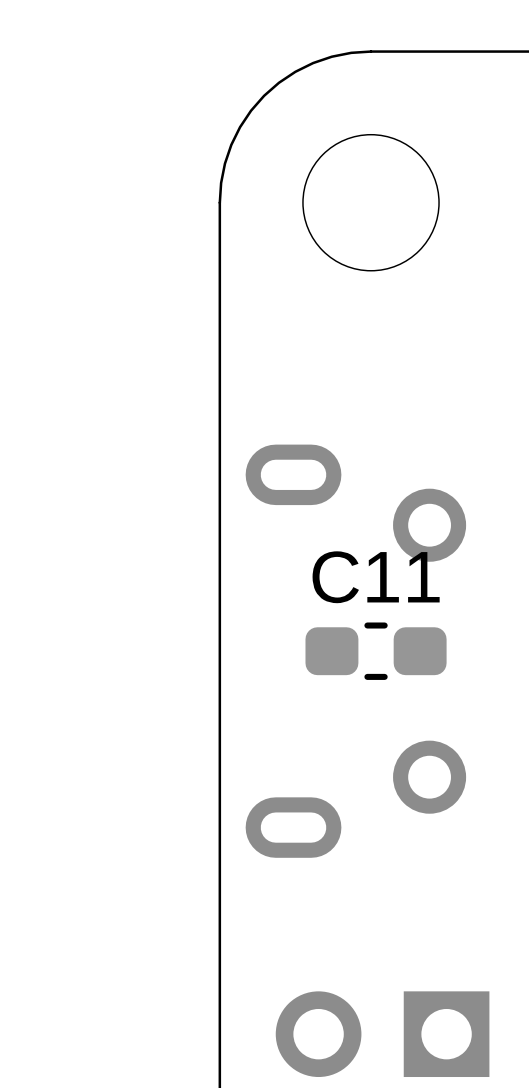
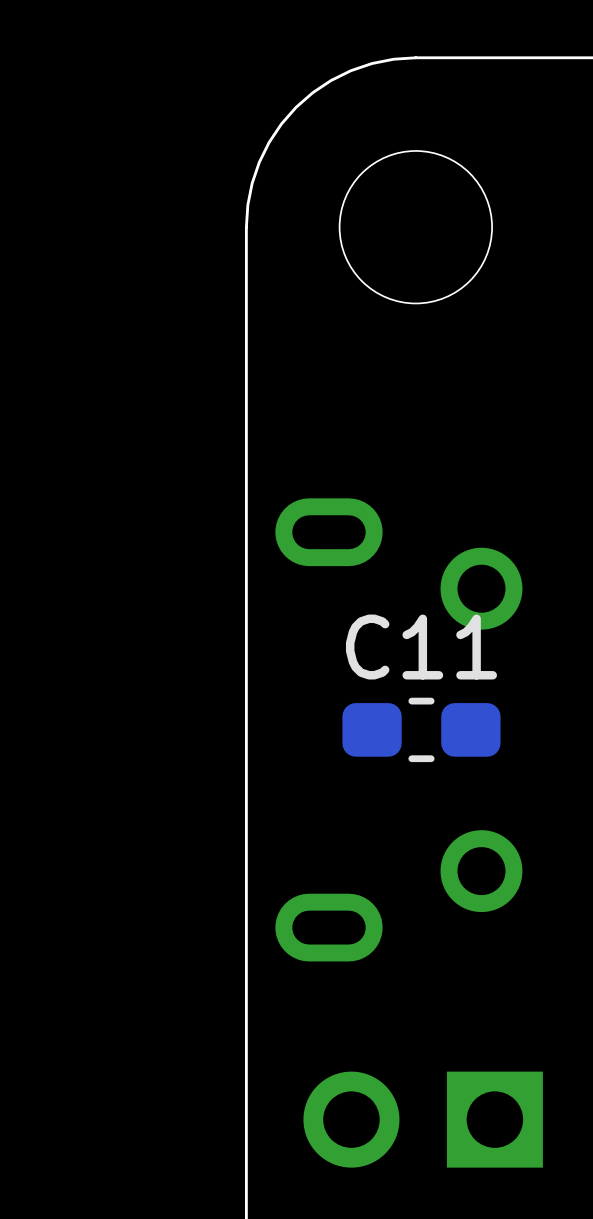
part position: (382, 1034) -> (423, 1119)

